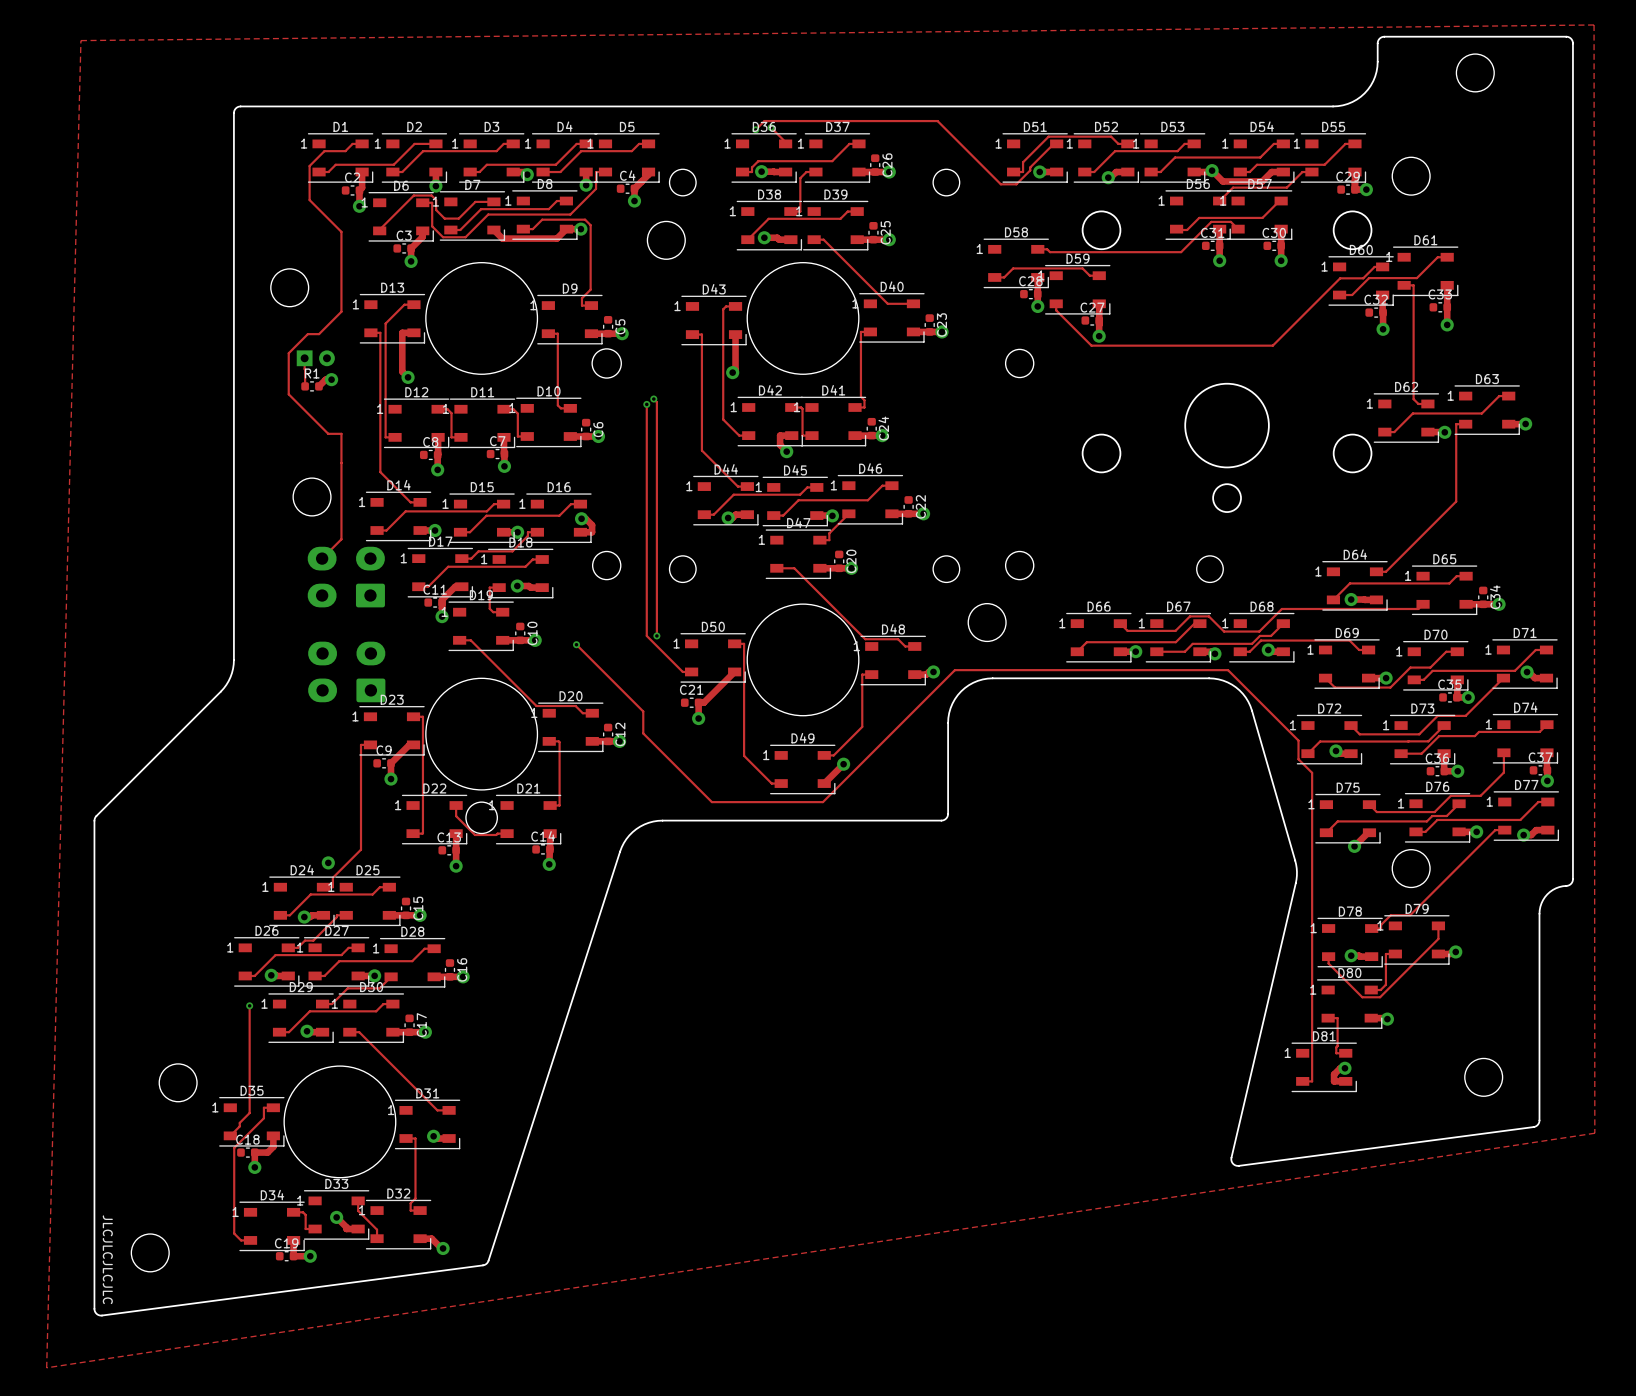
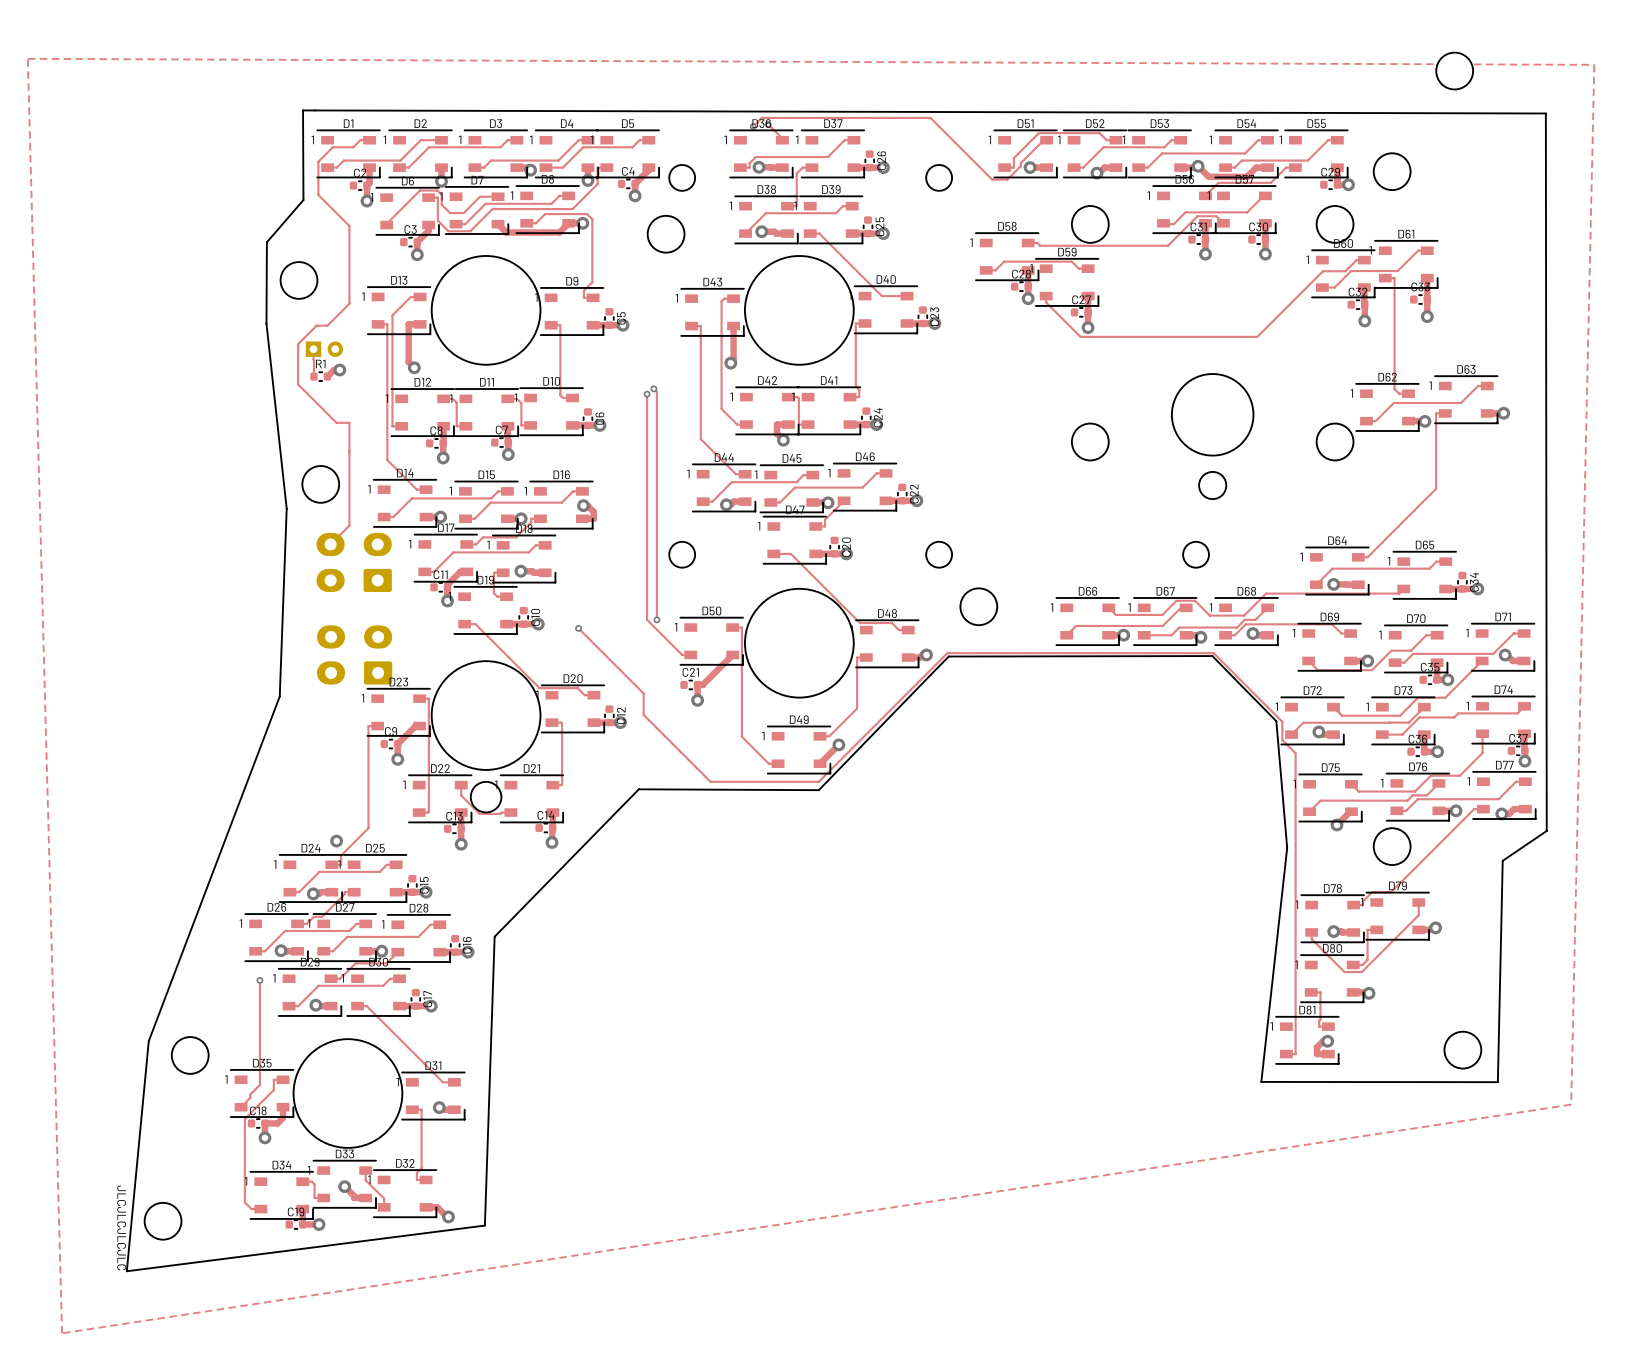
board edge: (1384, 36) (1566, 36) (1571, 38) (1572, 42) (1572, 879) (1569, 884) (1556, 888) (1547, 894) (1539, 910) (1539, 1120) (1537, 1125) (1238, 1165) (1233, 1164) (1231, 1157) (1296, 875) (1295, 860) (1248, 701) (1235, 687) (1227, 682) (1213, 678) (987, 678) (977, 680) (964, 688) (954, 699) (950, 708) (948, 722) (948, 813) (943, 820) (662, 820) (644, 824) (629, 835) (620, 851) (485, 1264) (102, 1315) (96, 1313) (94, 1308) (94, 819) (223, 688) (230, 677) (233, 664) (233, 113) (235, 108) (240, 106) (1338, 106) (1356, 99) (1370, 85) (1377, 66) (1377, 41) (1384, 36) -> (303, 110) (303, 200) (266, 242) (266, 323) (286, 508) (279, 696) (148, 1041) (126, 1271) (484, 1225) (494, 936) (638, 789) (818, 790) (948, 656) (1212, 656) (1276, 721) (1287, 847) (1261, 1081) (1497, 1082) (1502, 860) (1546, 830) (1545, 113) (303, 110)
round board edge: [591, 348, 622, 379] -> none
round board edge: [1004, 348, 1035, 379] -> none
round board edge: [592, 550, 622, 581] -> none
round board edge: [1004, 550, 1035, 581] -> none
zone outline: (1594, 1133) (1594, 24) (80, 40) (46, 1367) -> (1571, 1104) (1594, 64) (27, 58) (62, 1333)

